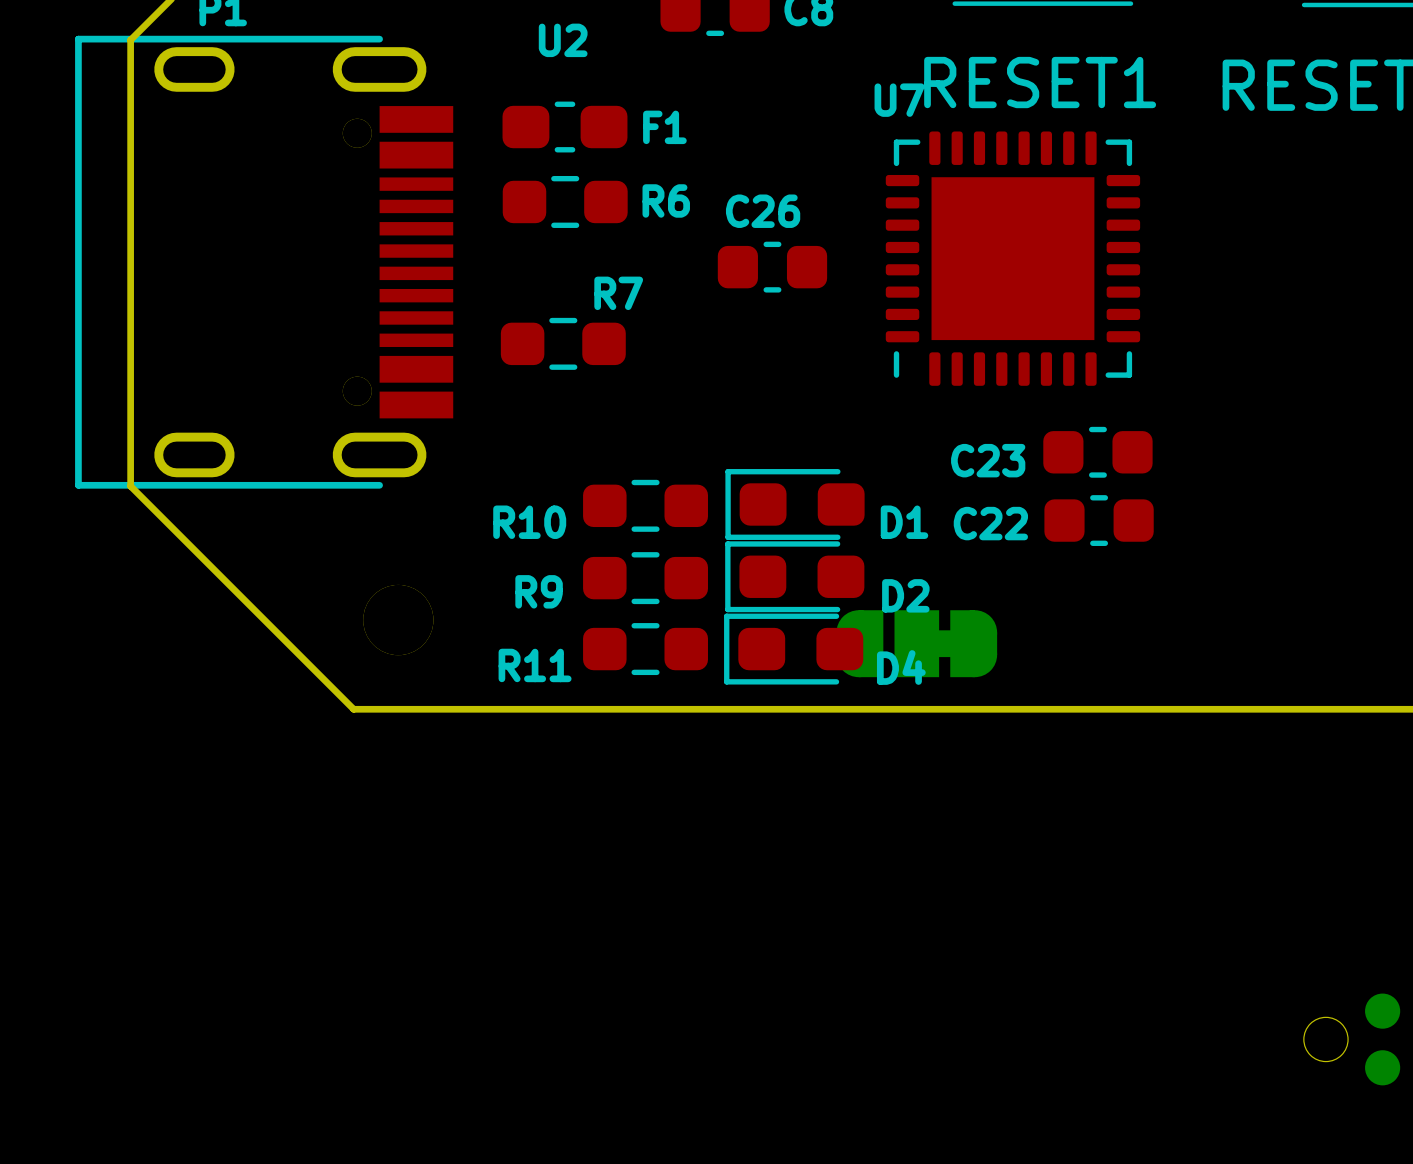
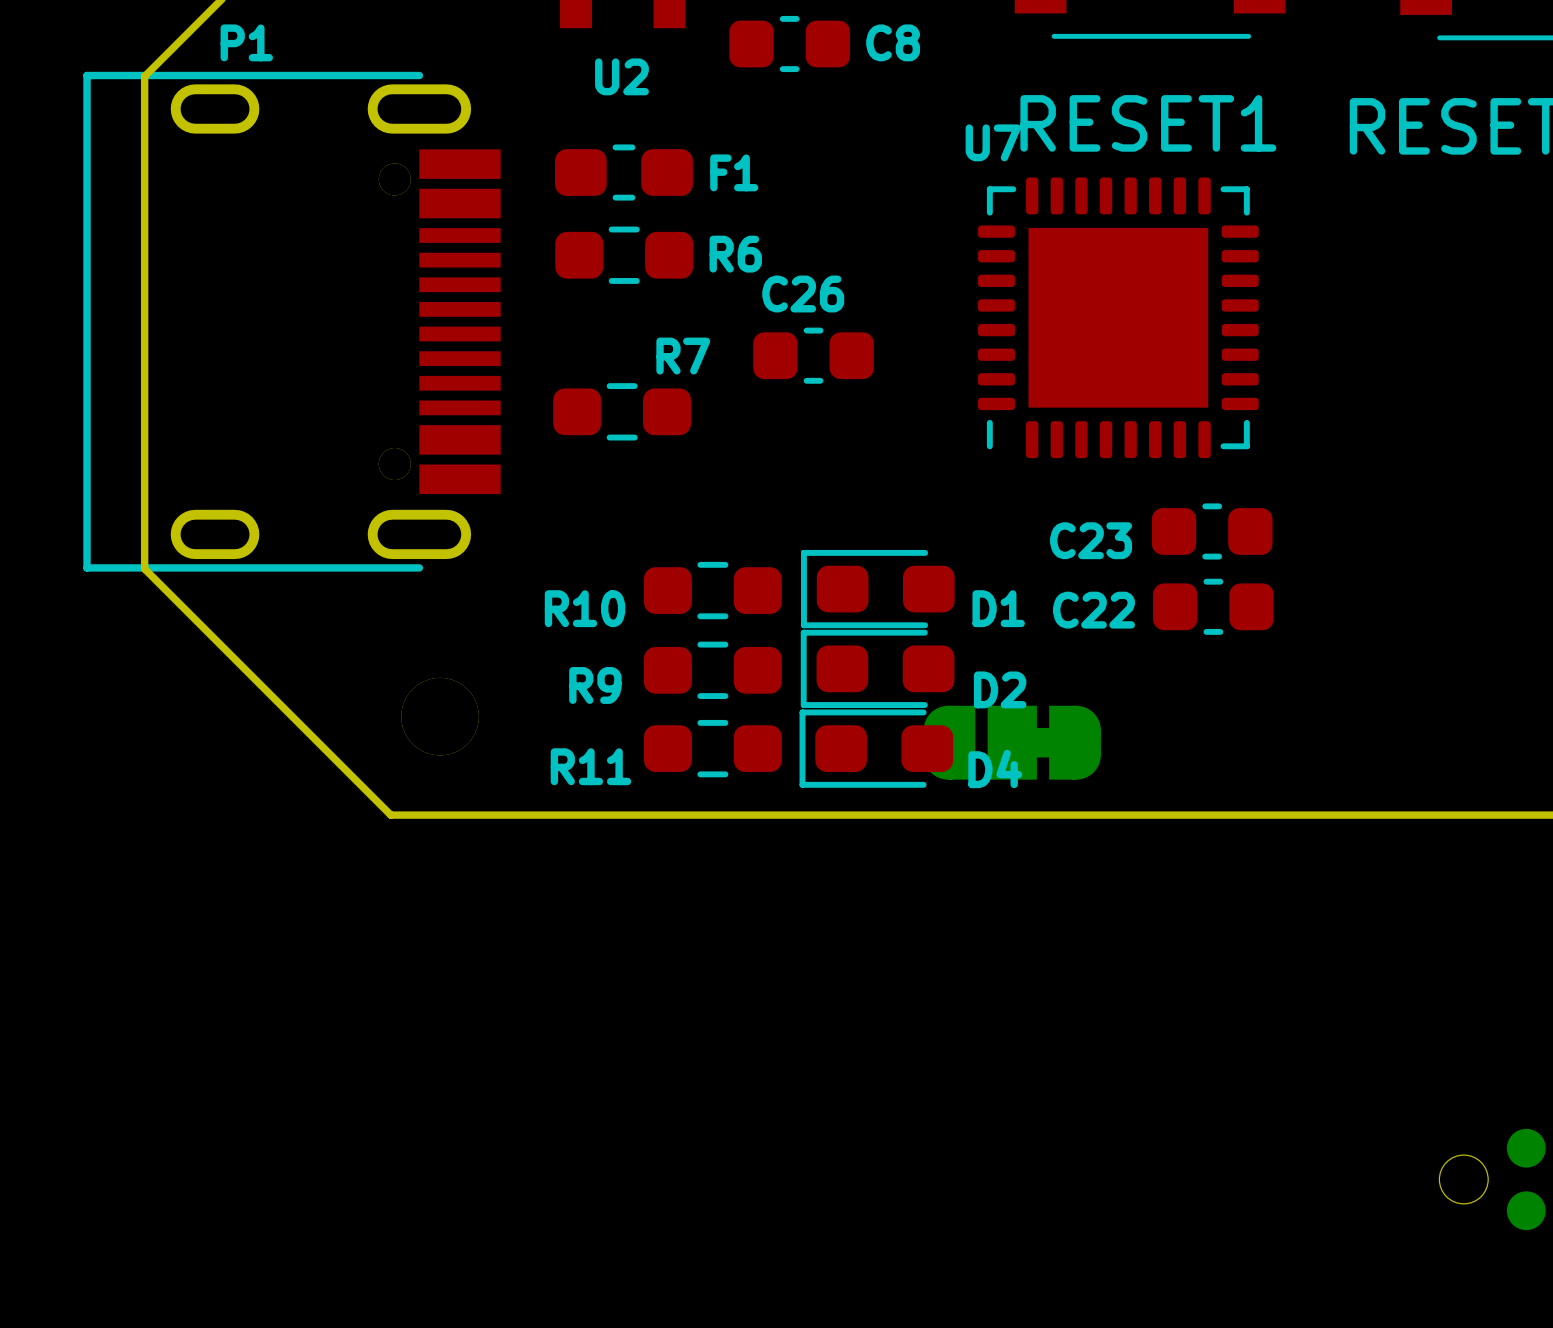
C26 position: (772, 267) -> (813, 355)

